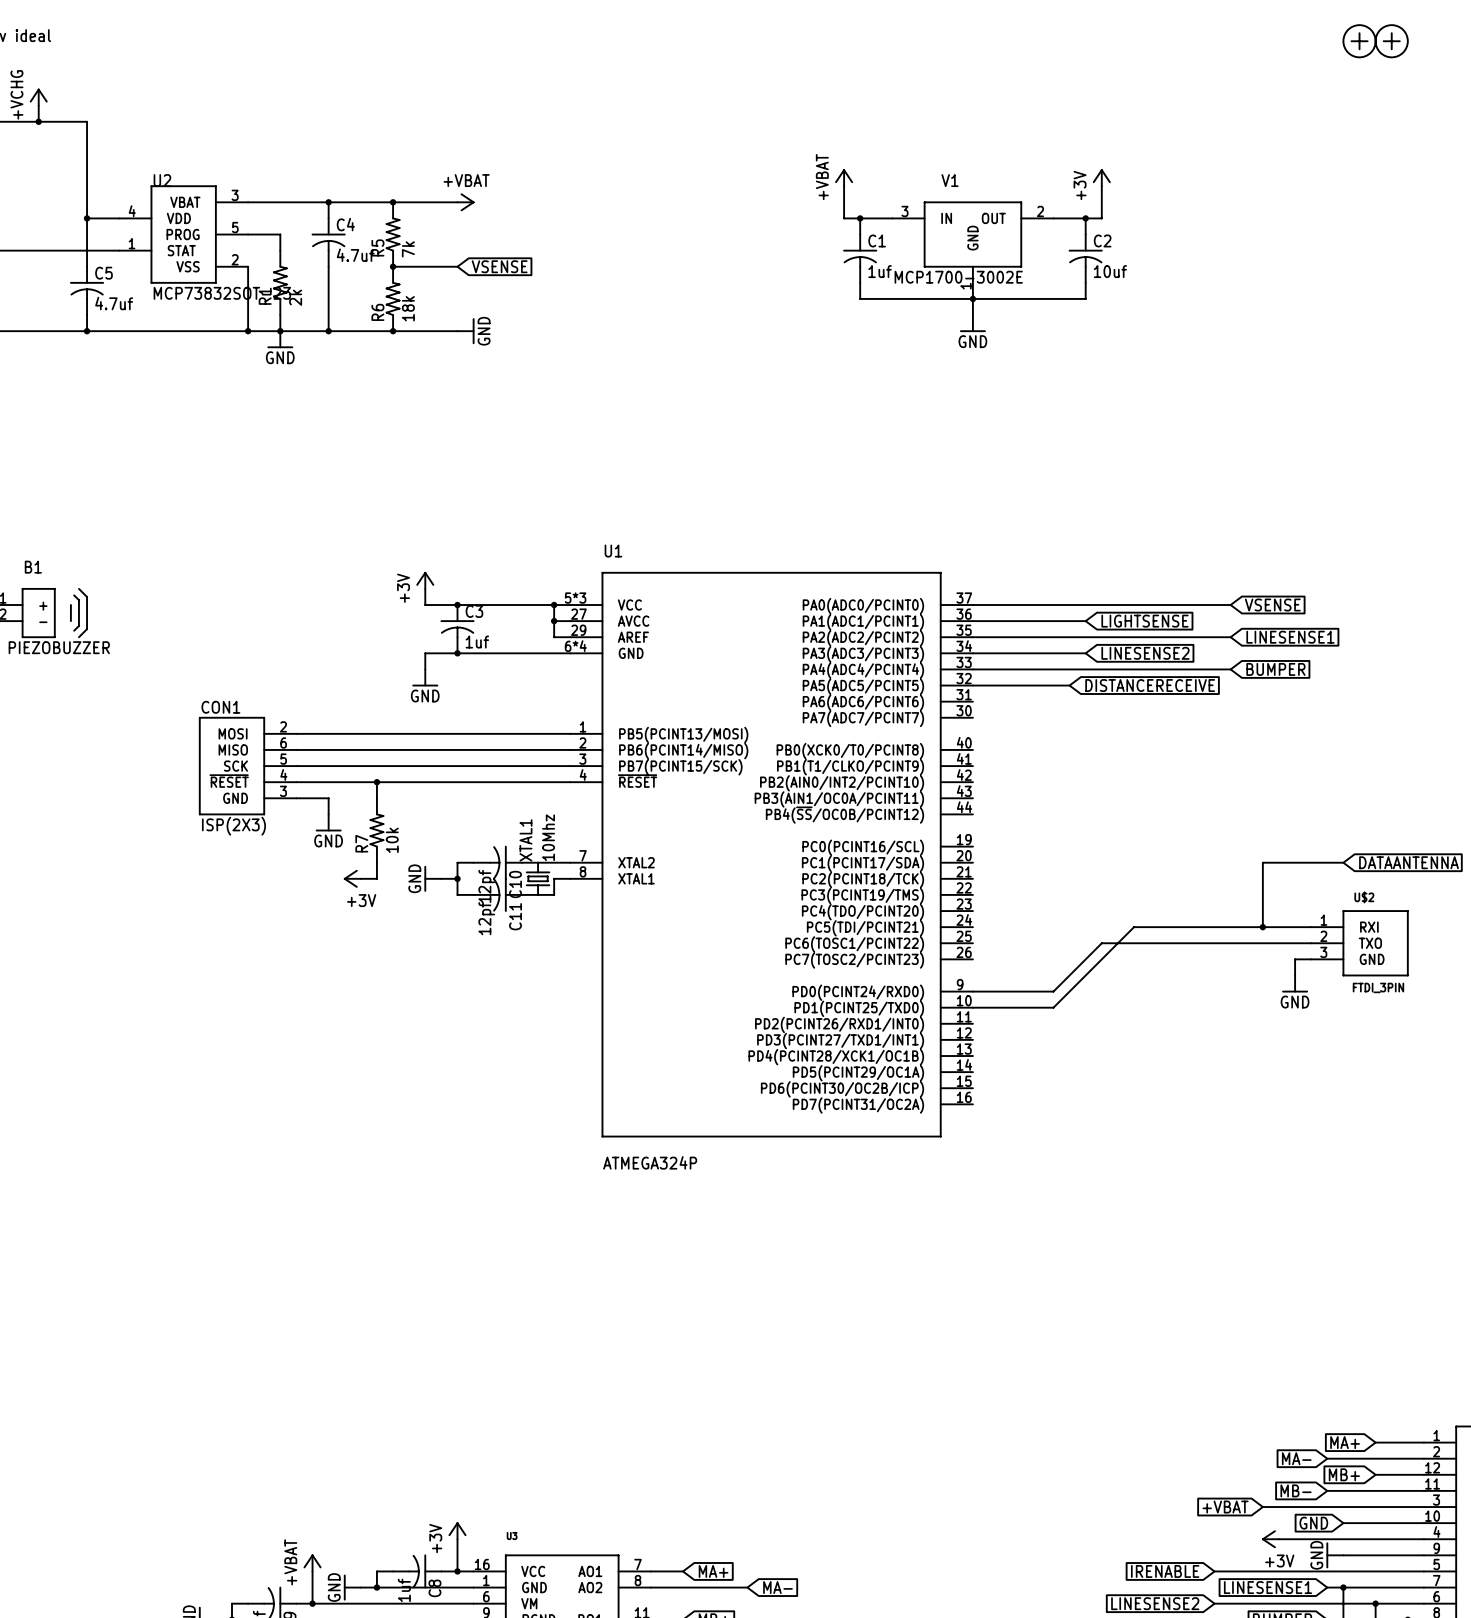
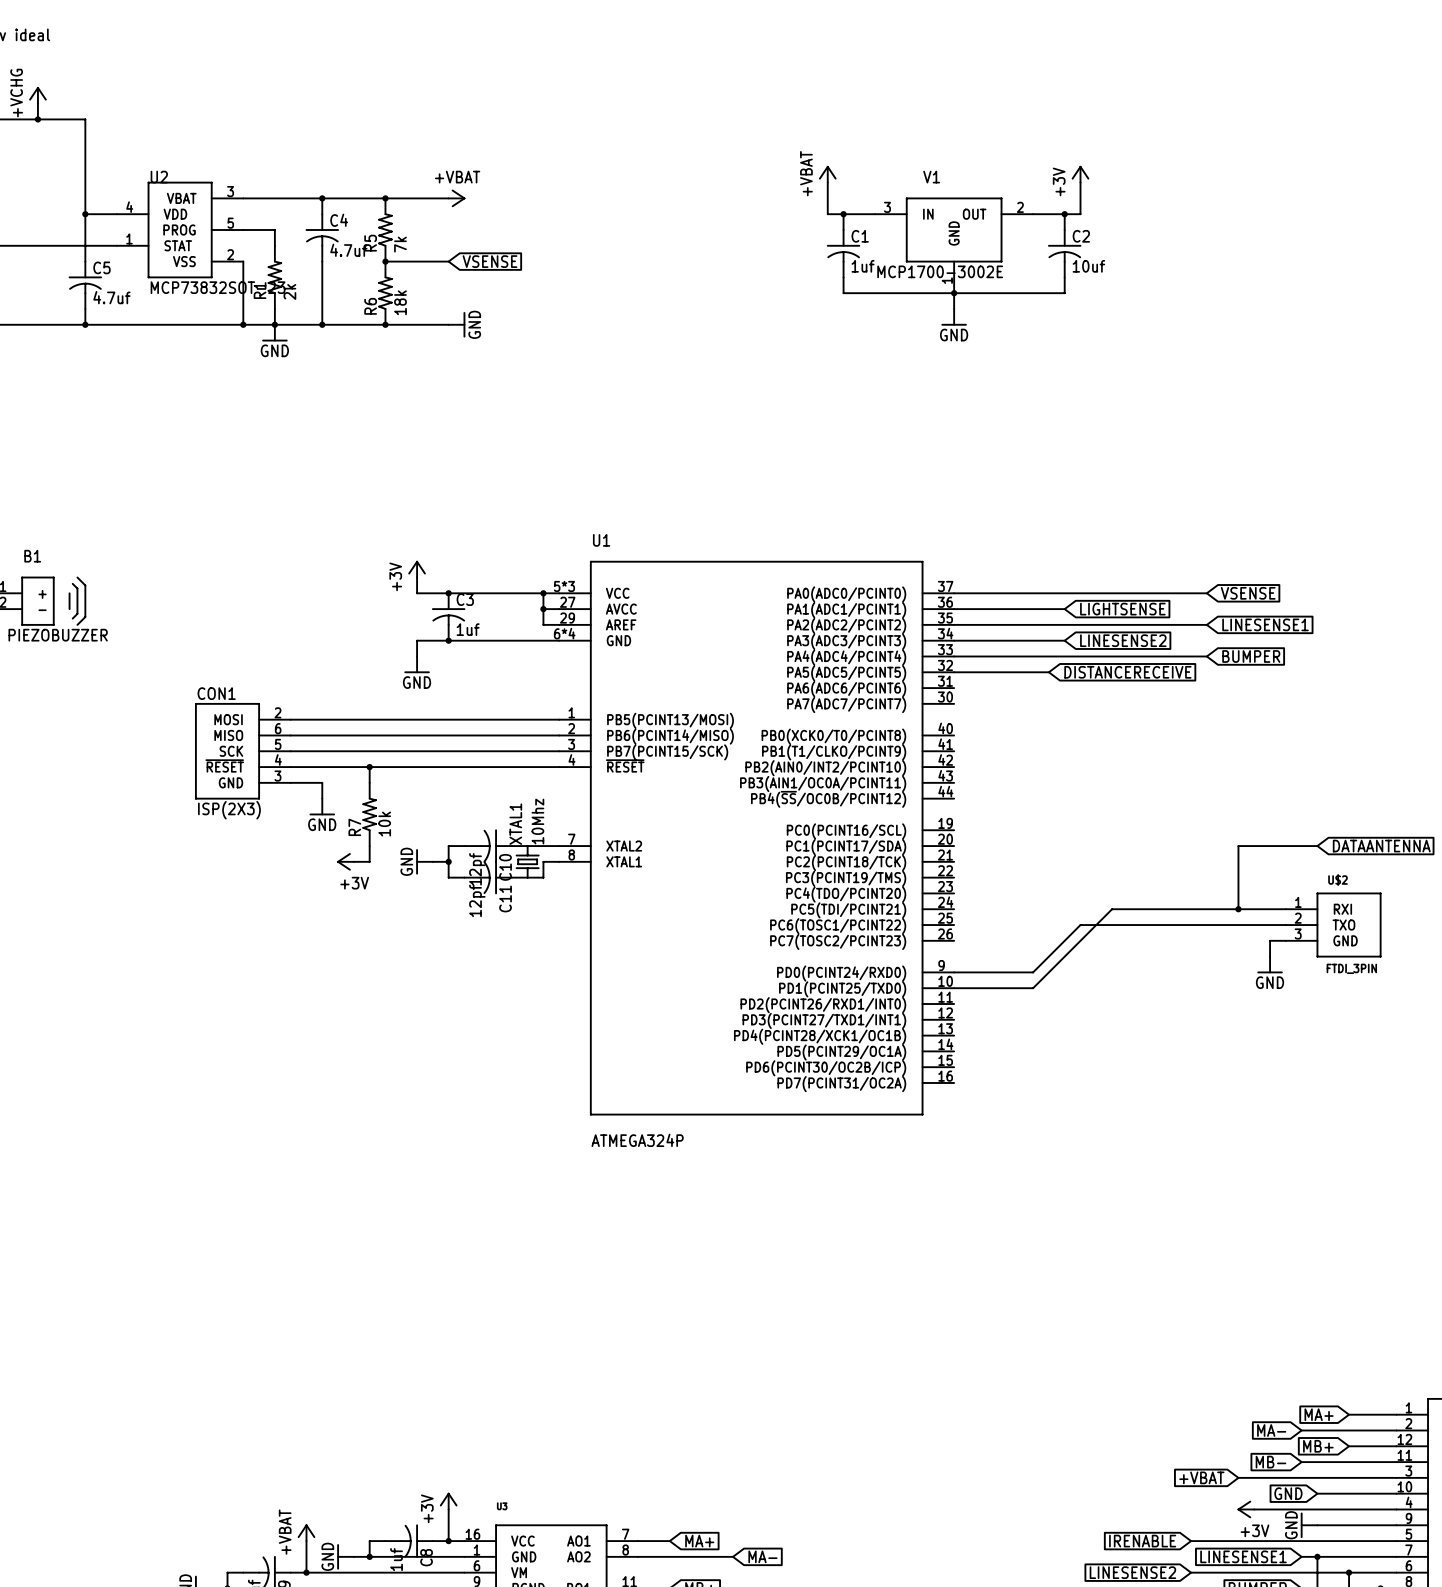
part: (1359, 41) -> none
part: (1391, 41) -> none

